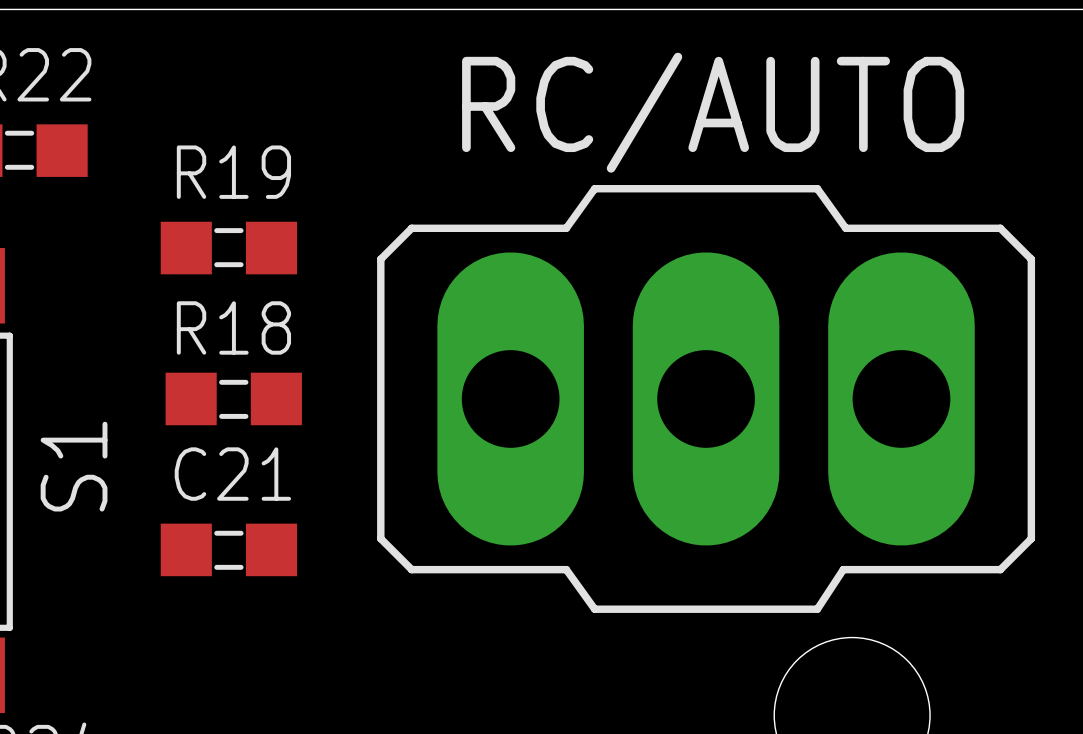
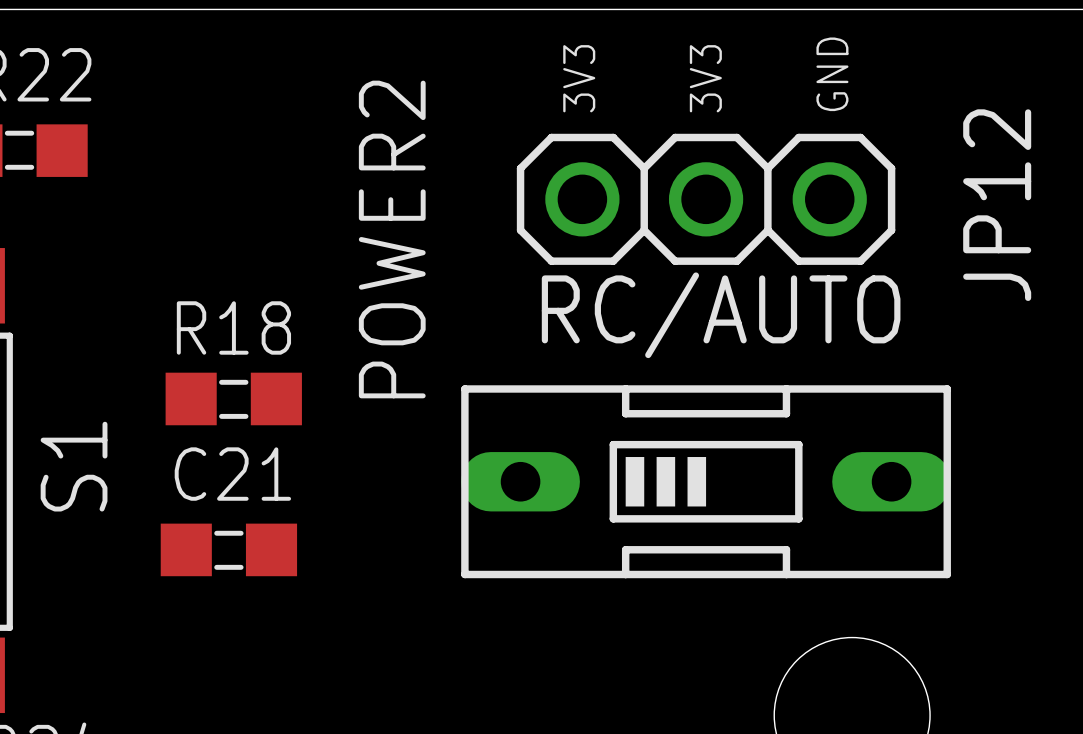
text: none -> GND (832, 74)
text: none -> 3V3 (579, 78)
text: none -> 3V3 (705, 78)
JP12: none -> POWER2 (706, 199)
R19: (228, 248) -> none
RC/AUTO: (706, 398) -> none
RC/AUTO: none -> (706, 481)

